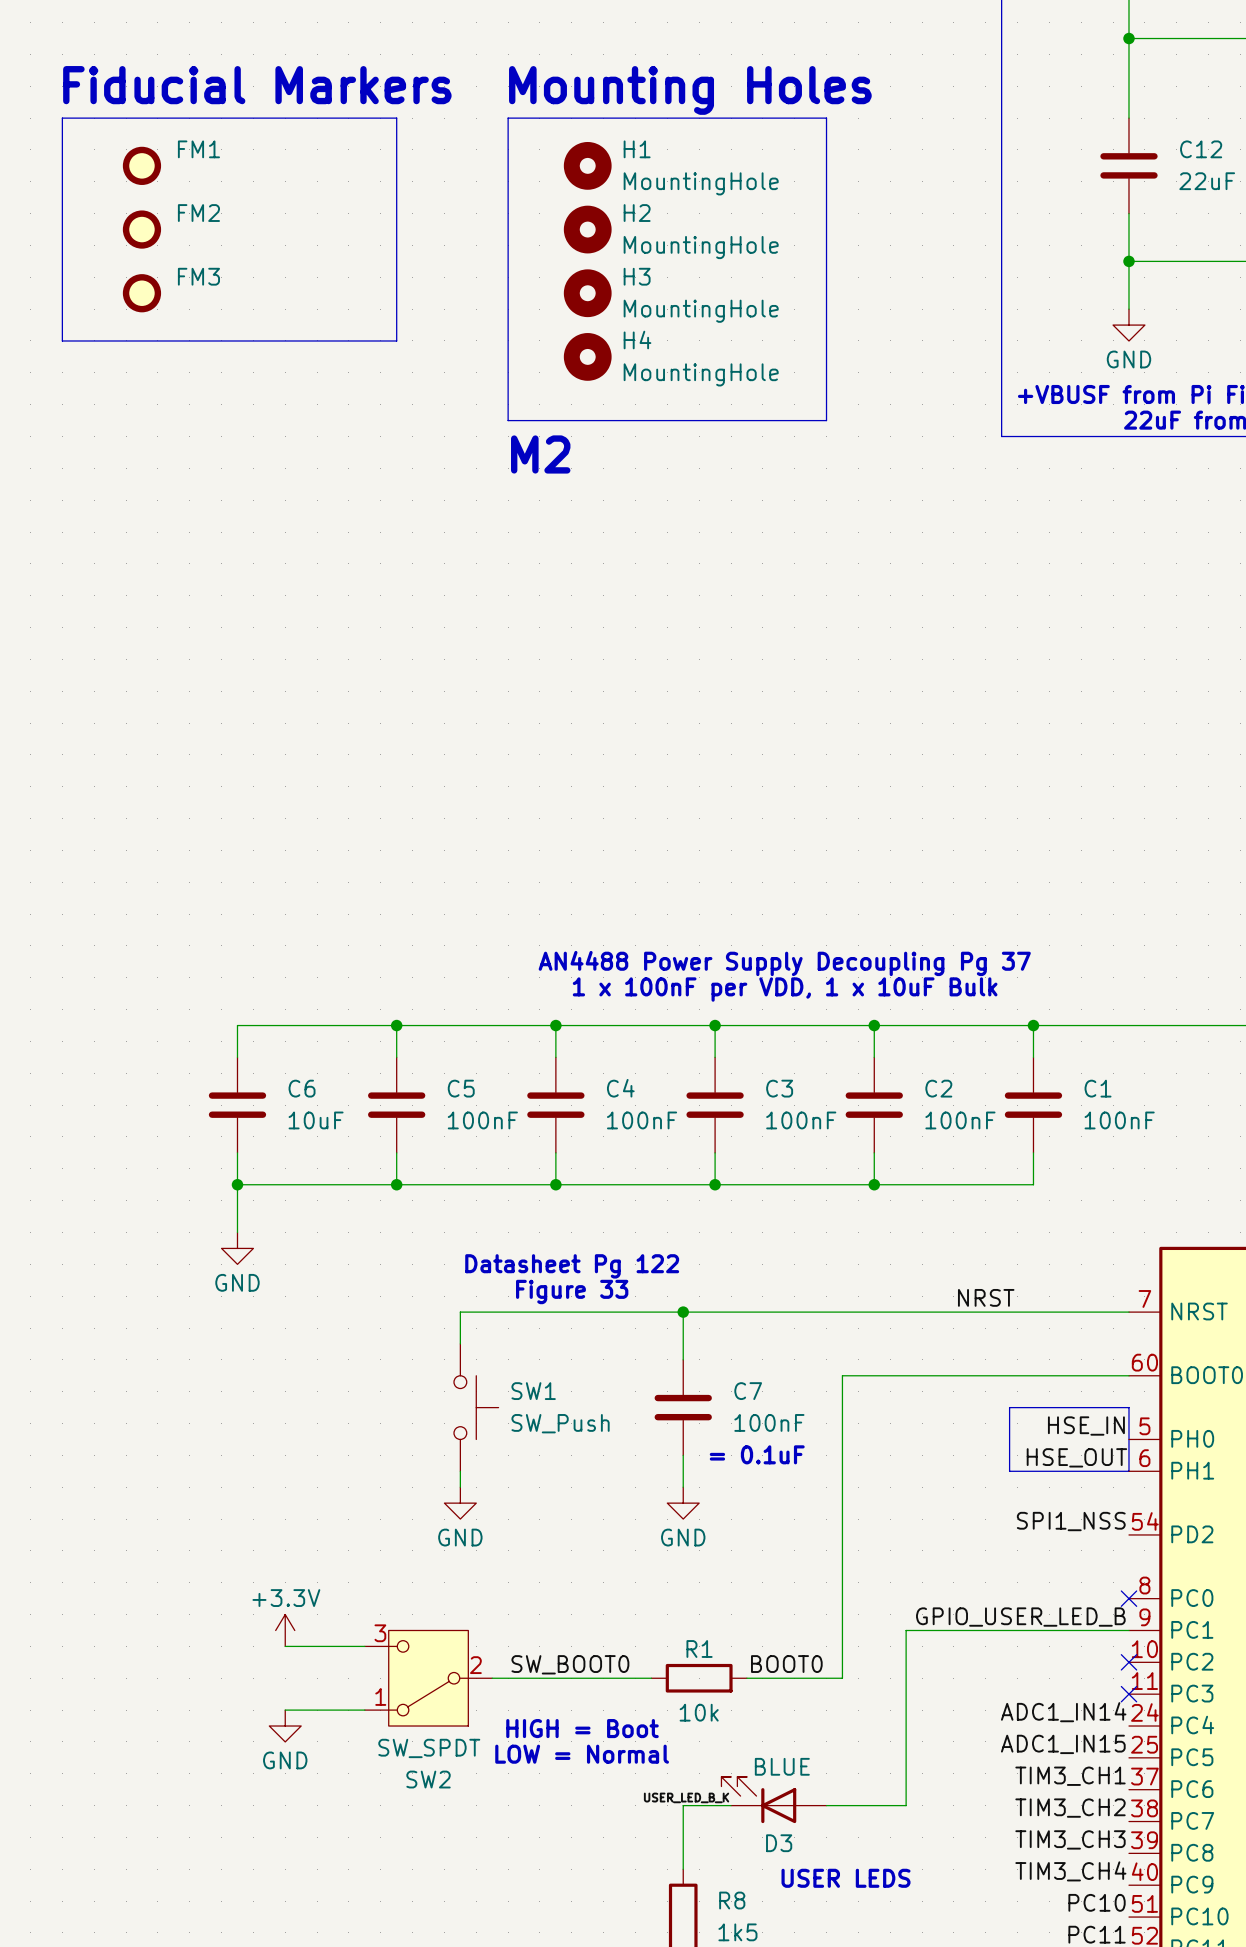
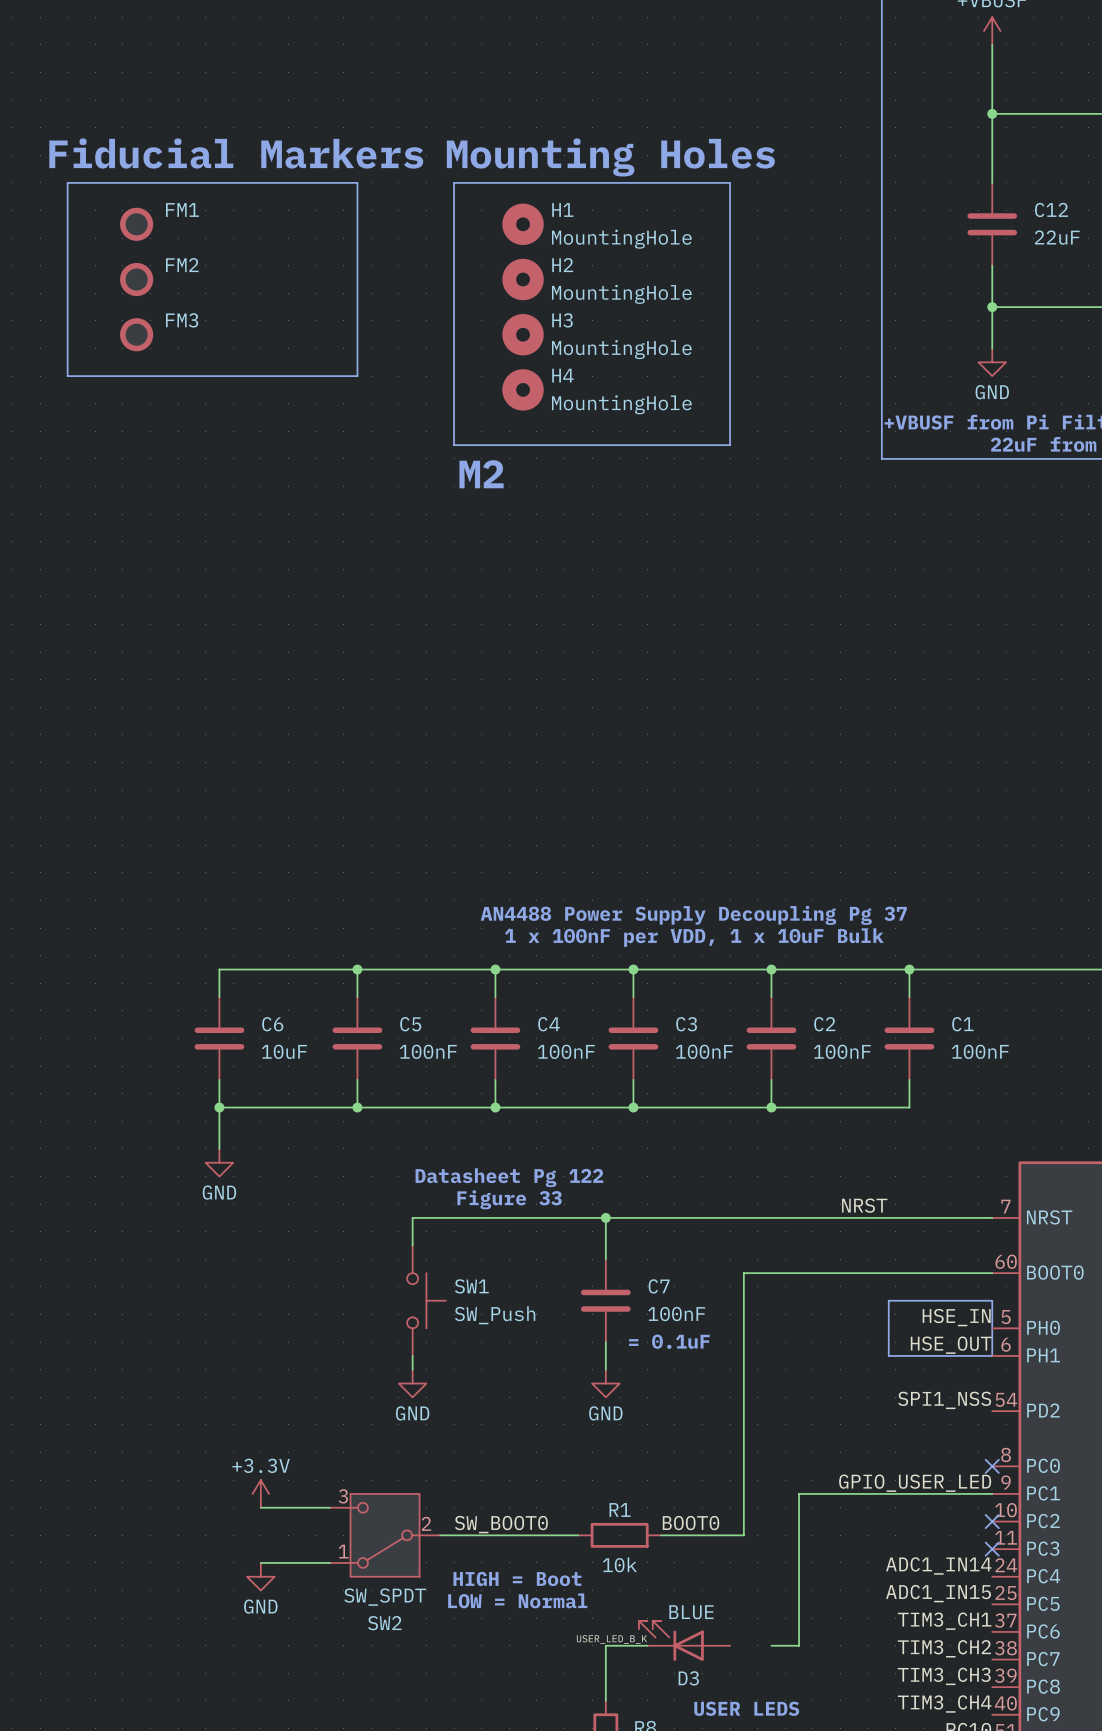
label: GPIO_USER_LED_B (1020, 1617) -> GPIO_USER_LED (915, 1483)
wire: (826, 1805) (874, 1805) -> none

